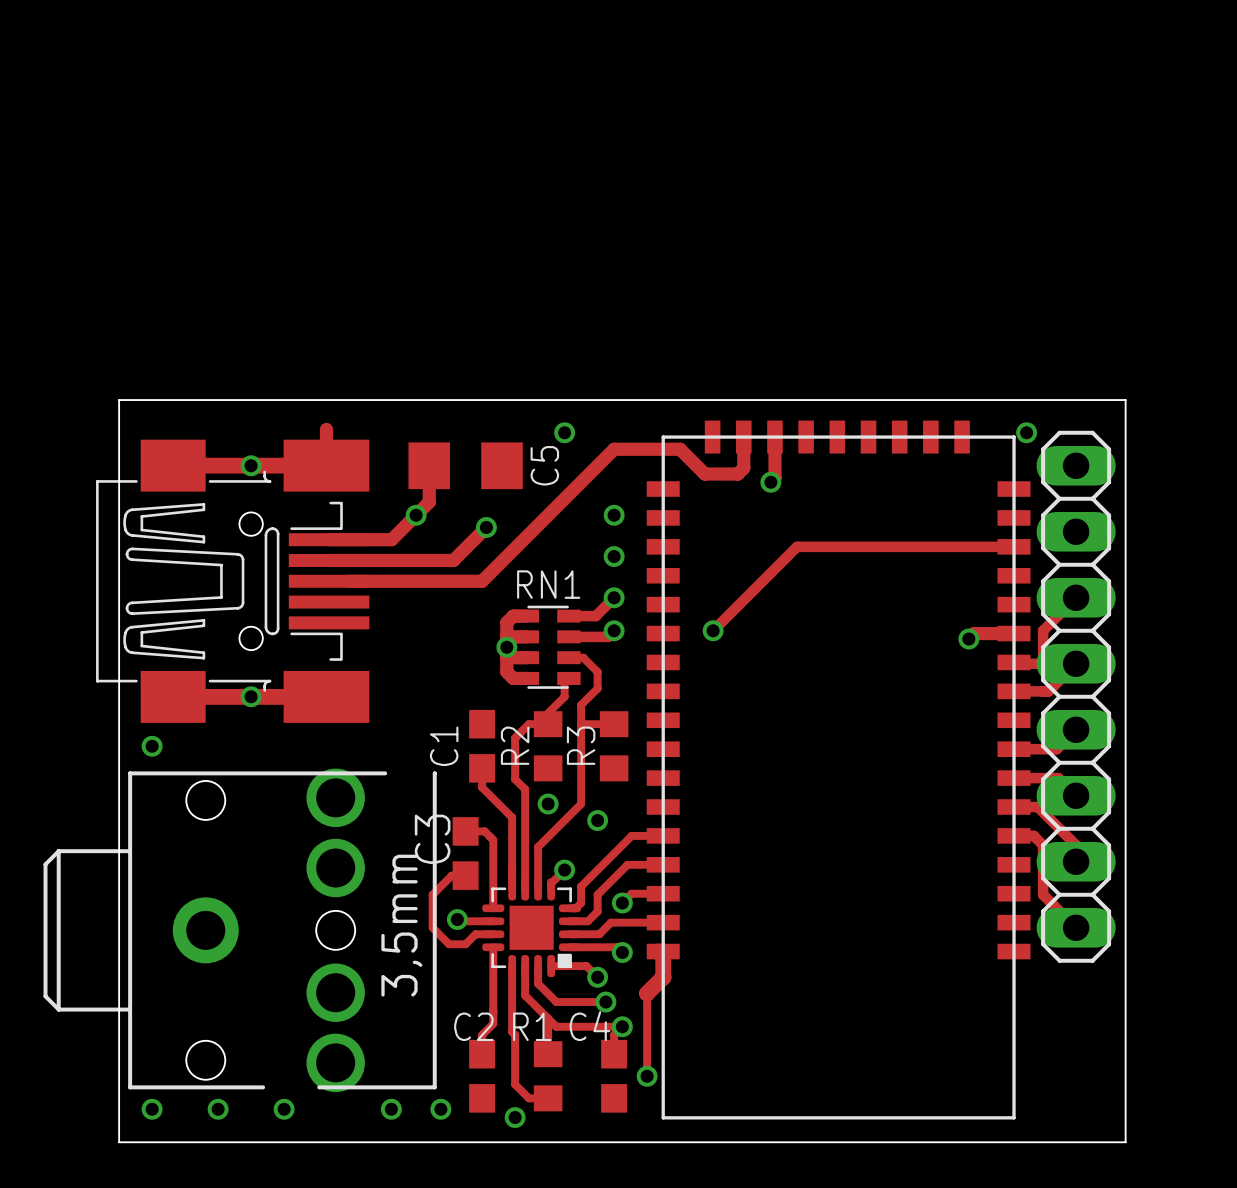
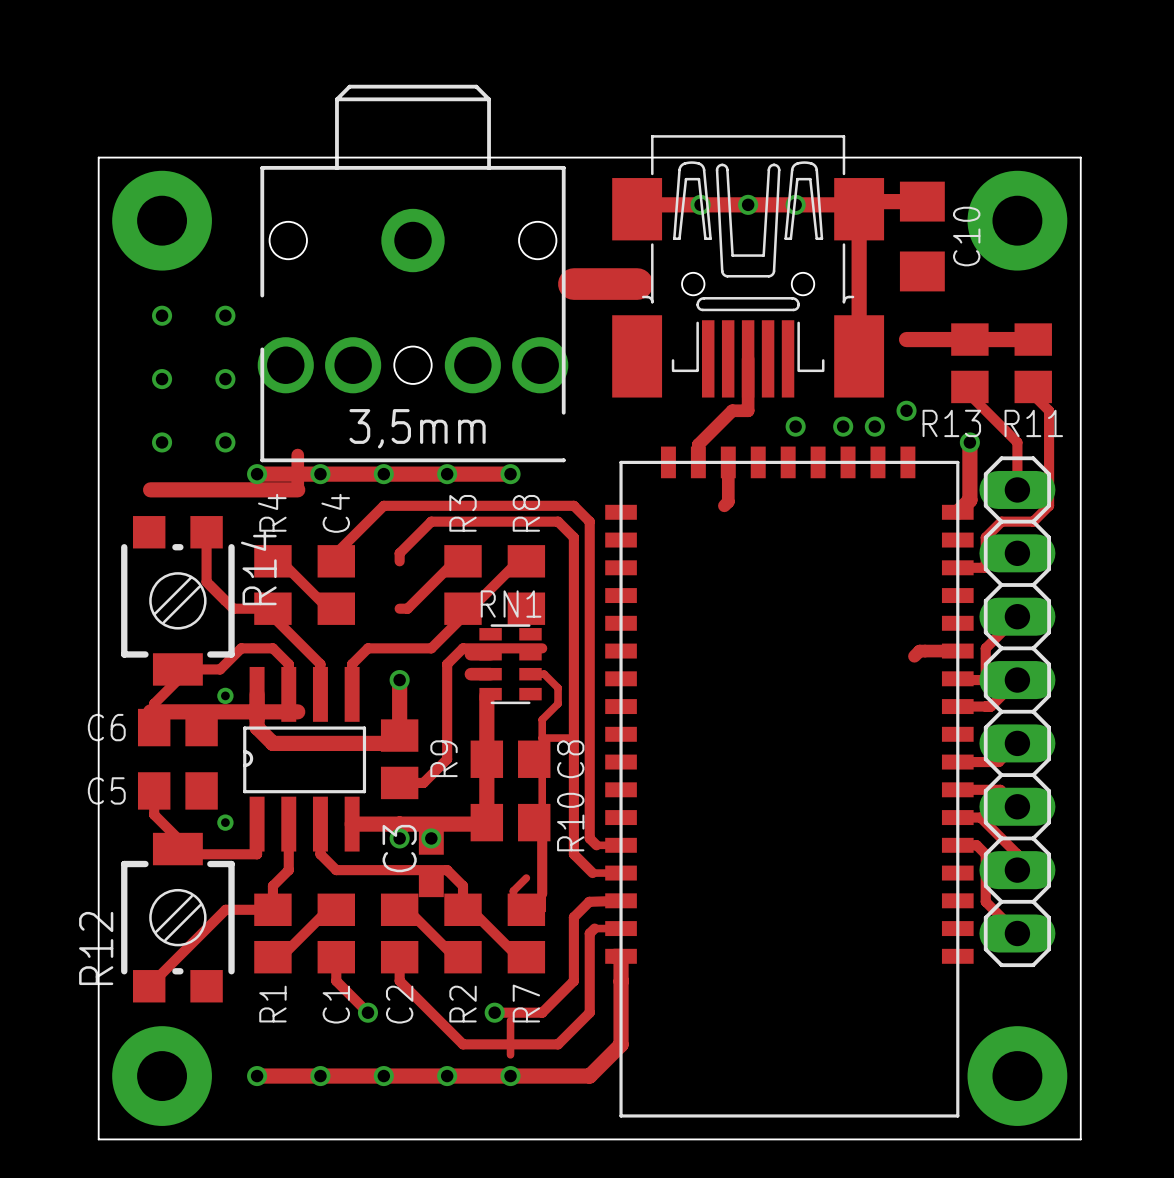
track: none -> (922, 201) (862, 201) (859, 204) (637, 204)
via: none -> (700, 204)
via: none -> (748, 204)
via: none -> (795, 204)
track: none -> (859, 209) (859, 356)
via: none -> (162, 220)
via: none -> (1017, 220)
C10: none -> (922, 236)
part: none -> (748, 266)
part: none -> (413, 273)
track: none -> (573, 284) (637, 284)
via: none -> (162, 315)
via: none -> (225, 315)
track: none -> (906, 339) (1033, 339)
track: none -> (748, 358) (748, 410) (732, 410) (698, 444) (698, 462)
R13: none -> (969, 363)
R11: none -> (1033, 363)
via: none -> (162, 379)
via: none -> (225, 379)
track: none -> (969, 386) (969, 394) (1017, 442) (1017, 489)
track: none -> (1033, 386) (1033, 394) (1049, 410) (1049, 505) (1033, 521) (1001, 521) (985, 537) (985, 567) (957, 567)
via: none -> (906, 410)
via: none -> (795, 426)
via: none -> (843, 426)
via: none -> (874, 426)
board edge: (119, 400) (1125, 400) (1125, 1142) -> (98, 426) (98, 157) (1080, 157) (1080, 1139) (1064, 1139)
via: none -> (162, 442)
via: none -> (225, 442)
track: none -> (969, 442) (969, 500) (957, 512)
via position: (564, 432) -> (510, 474)
via position: (1026, 432) -> (969, 442)
C5 footprint: [408, 442, 523, 490] -> [137, 772, 218, 810]
track: none -> (257, 474) (510, 474)
via: none -> (257, 474)
via: none -> (320, 474)
via: none -> (383, 474)
via: none -> (447, 474)
track: (743, 449) (743, 437) (743, 468) (737, 474) (704, 474) (680, 449) (614, 449) (482, 581) (329, 581) -> none
via: (251, 465) -> none
track: (429, 465) (429, 502) (391, 539) (329, 539) -> none
C5 name position: C5 (544, 465) -> C5 (106, 790)
via: (770, 482) -> none
track: none -> (206, 532) (206, 582) (233, 608) (272, 608) (272, 616) (320, 664) (320, 694)
via: (416, 515) -> none
via: (614, 515) -> none
track: (486, 527) (453, 560) (329, 560) -> none
via: (486, 527) -> none
track: none -> (272, 561) (280, 561) (328, 608) (336, 608)
track: none -> (463, 561) (455, 561) (407, 608) (399, 608)
track: none -> (526, 561) (518, 561) (470, 608) (463, 608) (463, 616) (431, 648) (367, 648) (352, 664) (352, 694)
track: (1011, 546) (797, 546) (713, 630) -> none
via: (614, 556) -> none
R4: none -> (272, 585)
R8: none -> (526, 585)
R14: none -> (177, 600)
part: (232, 581) -> none
track: (614, 597) (595, 616) (568, 616) -> none
via: (614, 597) -> none
track: (527, 616) (513, 616) (506, 622) (506, 672) (513, 678) (527, 678) -> none
track: none -> (542, 648) (463, 648) (447, 664) (447, 759) (423, 782) (399, 782)
track: (614, 630) (608, 636) (568, 636) -> none
via: (614, 630) -> none
via: (713, 630) -> none
via: (968, 639) -> none
via: (506, 647) -> none
track: none -> (399, 680) (399, 735) (407, 743) (272, 743) (257, 727) (257, 694)
via: none -> (399, 680)
track: none -> (288, 694) (288, 664) (272, 648) (241, 648) (220, 669) (177, 669) (177, 680) (154, 703) (154, 727)
track: (568, 678) (564, 678) (564, 696) (548, 713) (548, 724) (528, 724) (515, 738) (515, 779) (525, 789) (525, 889) -> none
track: none -> (486, 695) (486, 824) (352, 824)
via position: (251, 696) -> (225, 695)
C1 footprint: [469, 709, 496, 783] -> [317, 893, 356, 974]
R2 footprint: [533, 711, 563, 782] -> [444, 893, 482, 974]
R3 footprint: [599, 711, 629, 782] -> [444, 545, 482, 625]
C6: none -> (177, 727)
R2 name position: R2 (515, 745) -> R2 (463, 1004)
R3 name position: R3 (581, 745) -> R3 (463, 513)
via: (152, 746) -> none
part: none -> (304, 759)
R9: none -> (399, 759)
C1 name position: C1 (444, 746) -> C1 (336, 1004)
C8: none -> (510, 759)
track: (482, 768) (482, 787) (512, 817) (512, 889) -> none
track: none -> (154, 790) (154, 814) (177, 838) (177, 849) (183, 854) (257, 854) (255, 822)
via: (548, 804) -> none
track: (581, 804) (538, 847) (538, 889) -> (542, 814) (542, 893)
via: none -> (225, 822)
R10: none -> (510, 822)
track: none -> (288, 824) (288, 870) (272, 885) (272, 909) (225, 909) (149, 986)
track: none -> (320, 824) (320, 854) (336, 870) (447, 870) (463, 885) (463, 909) (470, 909) (518, 957) (526, 957)
via: (597, 820) -> none
via: none -> (399, 838)
via: none -> (431, 838)
track: (465, 831) (484, 831) (493, 839) (493, 908) -> none
track: (637, 835) (631, 835) (581, 886) -> (596, 845) (589, 838) (589, 521) (573, 505) (383, 505) (336, 553) (336, 561)
track: (633, 864) (627, 864) (597, 894) (597, 911) (587, 921) (569, 921) -> (592, 873) (573, 854) (573, 537) (558, 521) (431, 521) (399, 553) (399, 561)
via: (564, 870) -> none
track: (465, 875) (451, 875) (432, 894) (432, 927) (449, 944) (465, 944) (475, 934) (493, 934) -> none
track: none -> (621, 900) (589, 901) (573, 917) (573, 981) (542, 1012) (494, 1012)
track: none -> (336, 909) (328, 909) (280, 957) (272, 957)
track: none -> (399, 909) (407, 909) (455, 957) (463, 957)
via: (622, 903) -> none
R12: none -> (177, 917)
track: (457, 919) (493, 921) -> none
via: (457, 919) -> none
track: (635, 922) (611, 922) (599, 934) (569, 934) -> (594, 928) (589, 933) (589, 1012) (558, 1044) (463, 1044) (399, 981) (399, 957)
part: (531, 927) -> none
R7: none -> (526, 933)
part: (240, 930) -> none
track: (493, 947) (493, 1023) (482, 1035) (482, 1054) -> none
track: (569, 947) (617, 947) (622, 952) -> none
track: none -> (336, 957) (336, 981) (367, 1012)
via: (622, 952) -> none
track: (512, 966) (512, 1032) (515, 1035) (515, 1084) (528, 1098) (548, 1098) -> none
track: (525, 966) (525, 995) (556, 1026) (622, 1026) (614, 1035) (614, 1054) -> none
track: (538, 966) (538, 983) (556, 1002) (605, 1002) -> none
track: (551, 966) (586, 966) (597, 977) -> none
via: (597, 977) -> none
track: (663, 977) (647, 993) -> (621, 981) (621, 1044) (589, 1076) (257, 1076)
track: (647, 993) (647, 1076) -> none
via: (605, 1002) -> none
via: none -> (367, 1012)
via: none -> (494, 1012)
C2 name position: C2 (473, 1026) -> C2 (399, 1004)
R1 name position: R1 (532, 1026) -> R1 (272, 1004)
via: (622, 1026) -> none
C2 footprint: [469, 1039, 496, 1113] -> [380, 893, 419, 974]
C4 footprint: [601, 1039, 628, 1113] -> [317, 545, 356, 625]
R1 footprint: [533, 1041, 563, 1112] -> [254, 893, 292, 974]
via: none -> (162, 1076)
via: none -> (320, 1076)
via: none -> (383, 1076)
via: none -> (447, 1076)
via: none -> (510, 1076)
via: (647, 1076) -> none
via: none -> (1017, 1076)
via: (152, 1109) -> none
via: (218, 1109) -> none
via position: (284, 1109) -> (257, 1076)
via: (391, 1109) -> none
via: (440, 1109) -> none
via: (515, 1117) -> none

